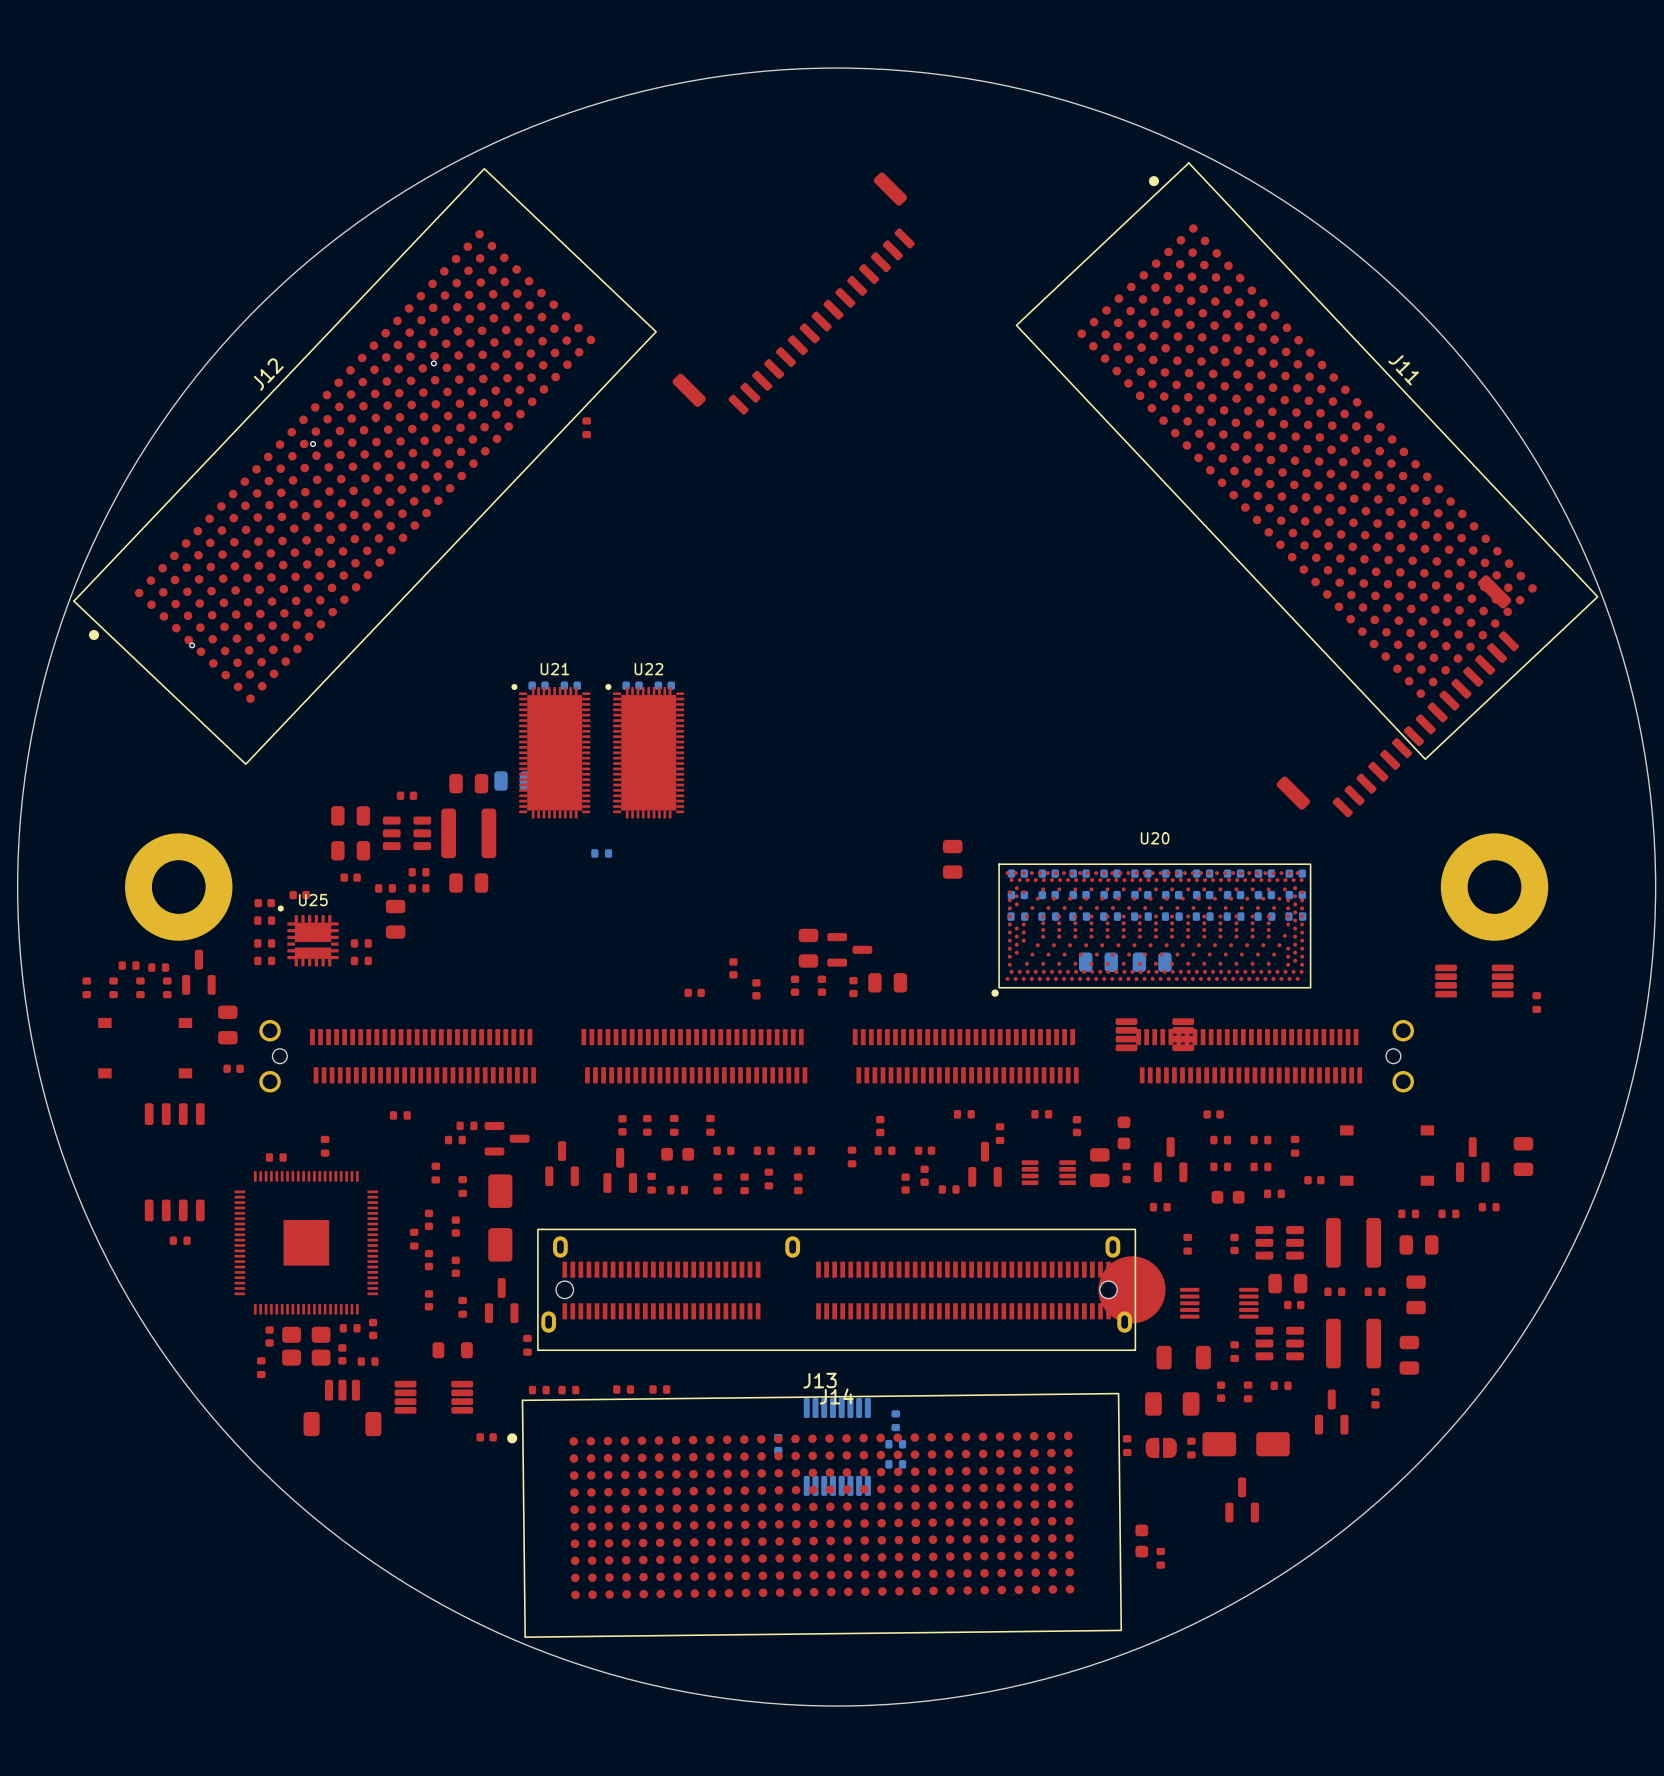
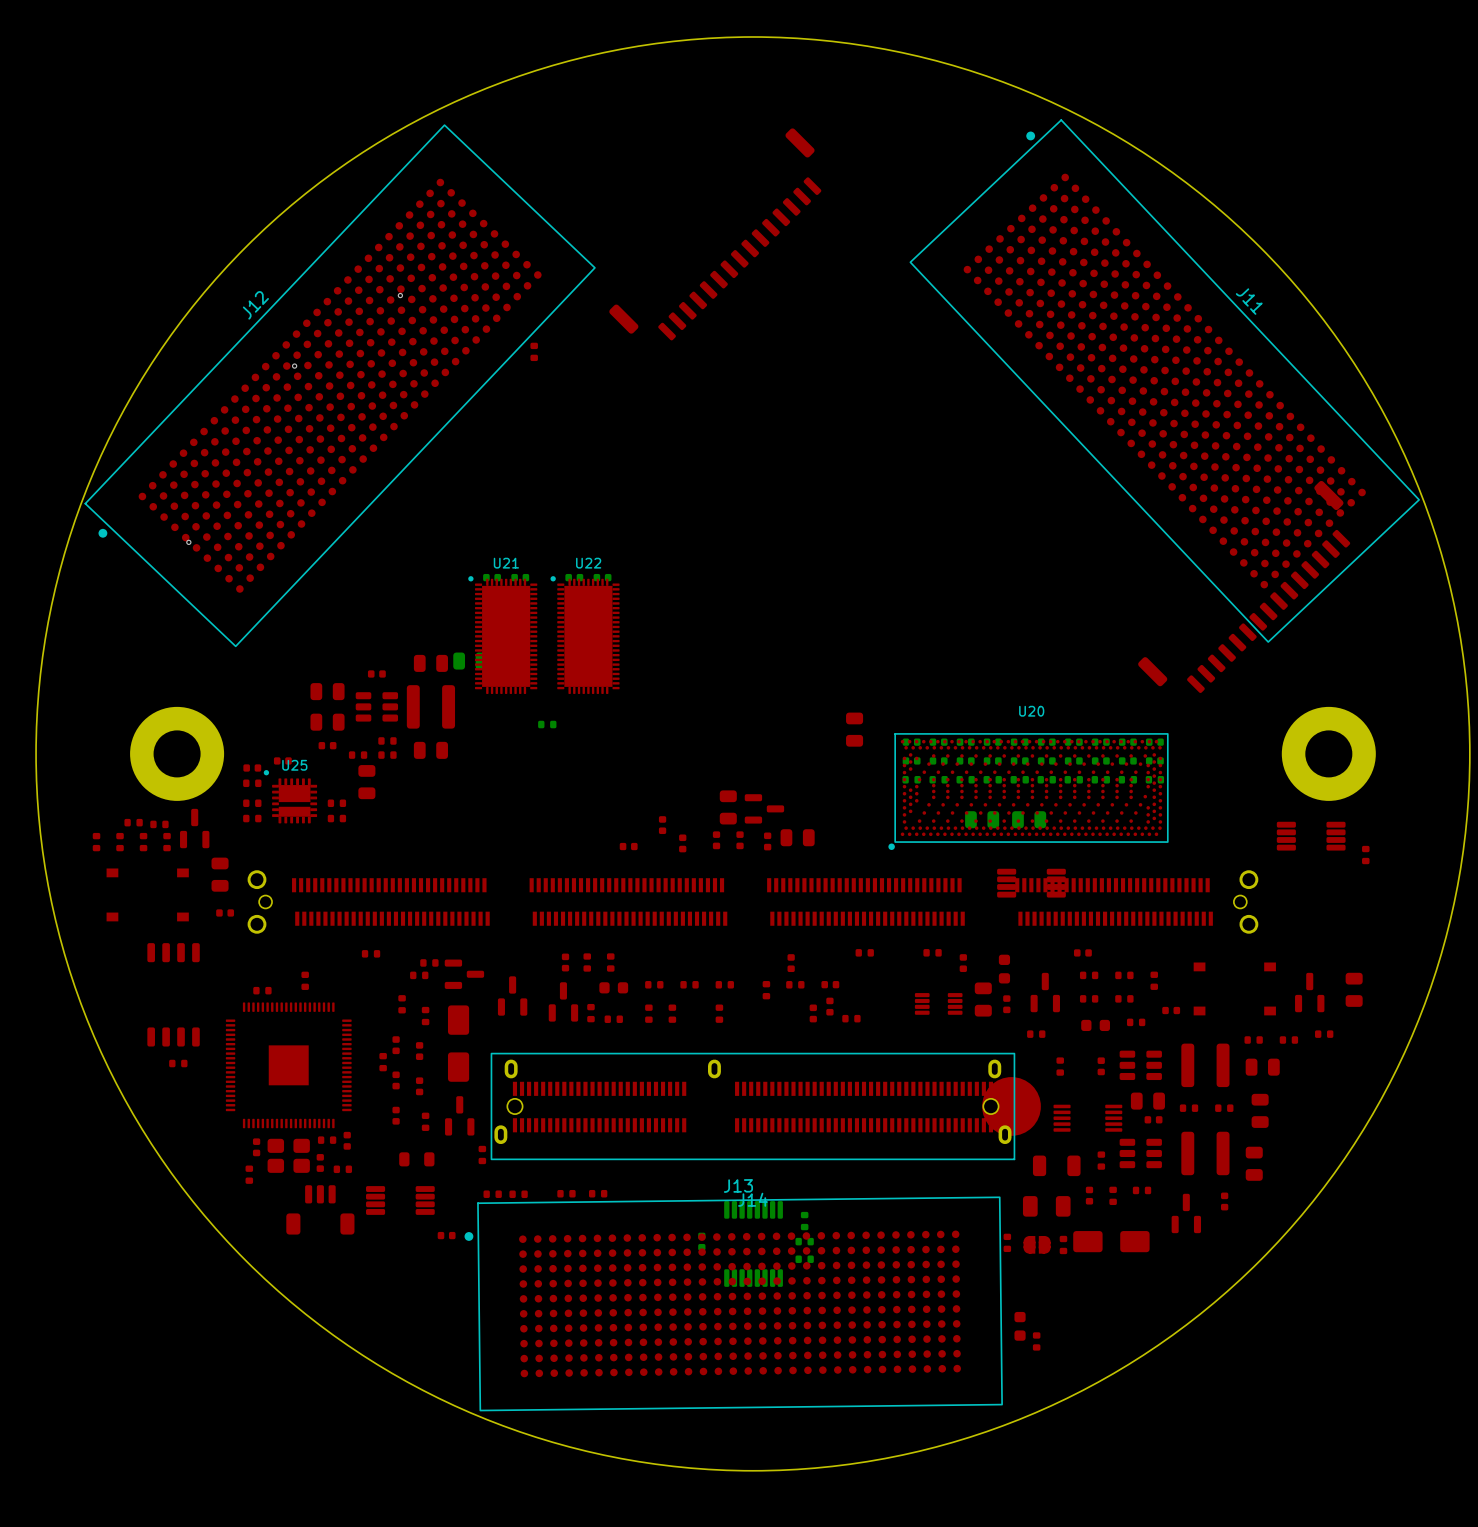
part: (710, 1125) -> none
part: (1000, 1133) -> none
part: (985, 1164) -> none
part: (768, 1179) -> none
part: (1242, 1499) -> none

